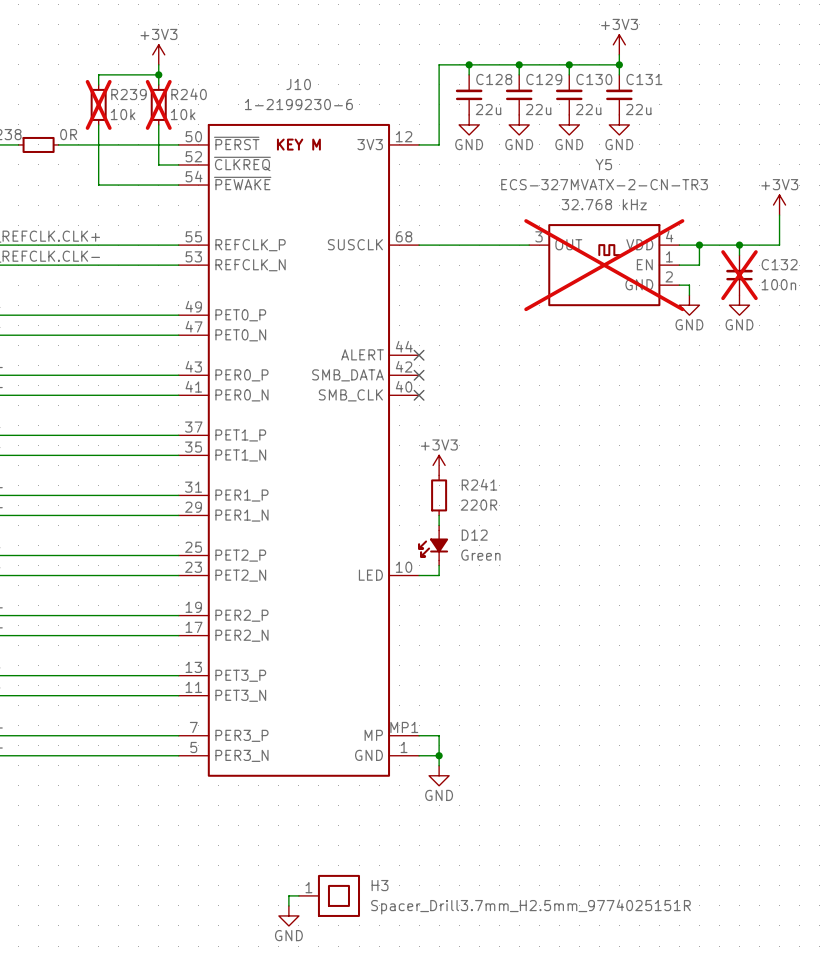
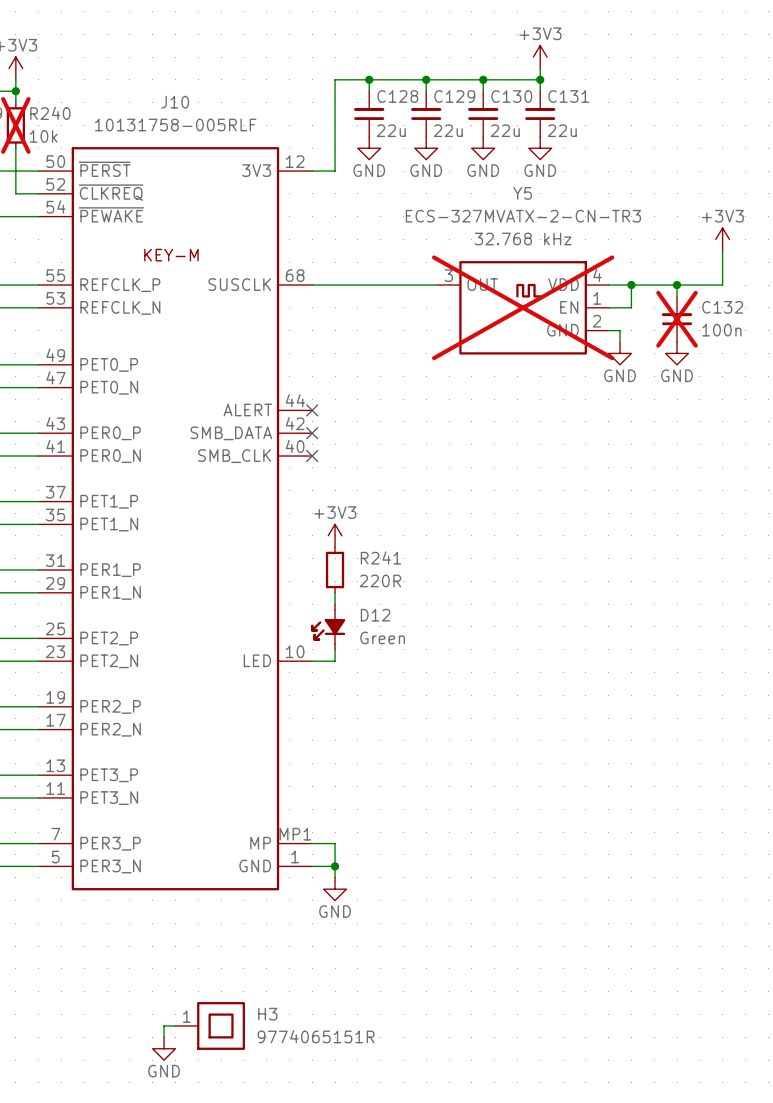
J10 text: 1-2199230-6 (298, 104) -> 10131758-005RLF (175, 124)
J10 text: KEY M (298, 144) -> none
J10 text: none -> KEY-M (171, 255)
H3 text: none -> 9774065151R (316, 1036)
H3 value: Spacer_Drill3.7mm_H2.5mm_9774025151R (530, 907) -> none

